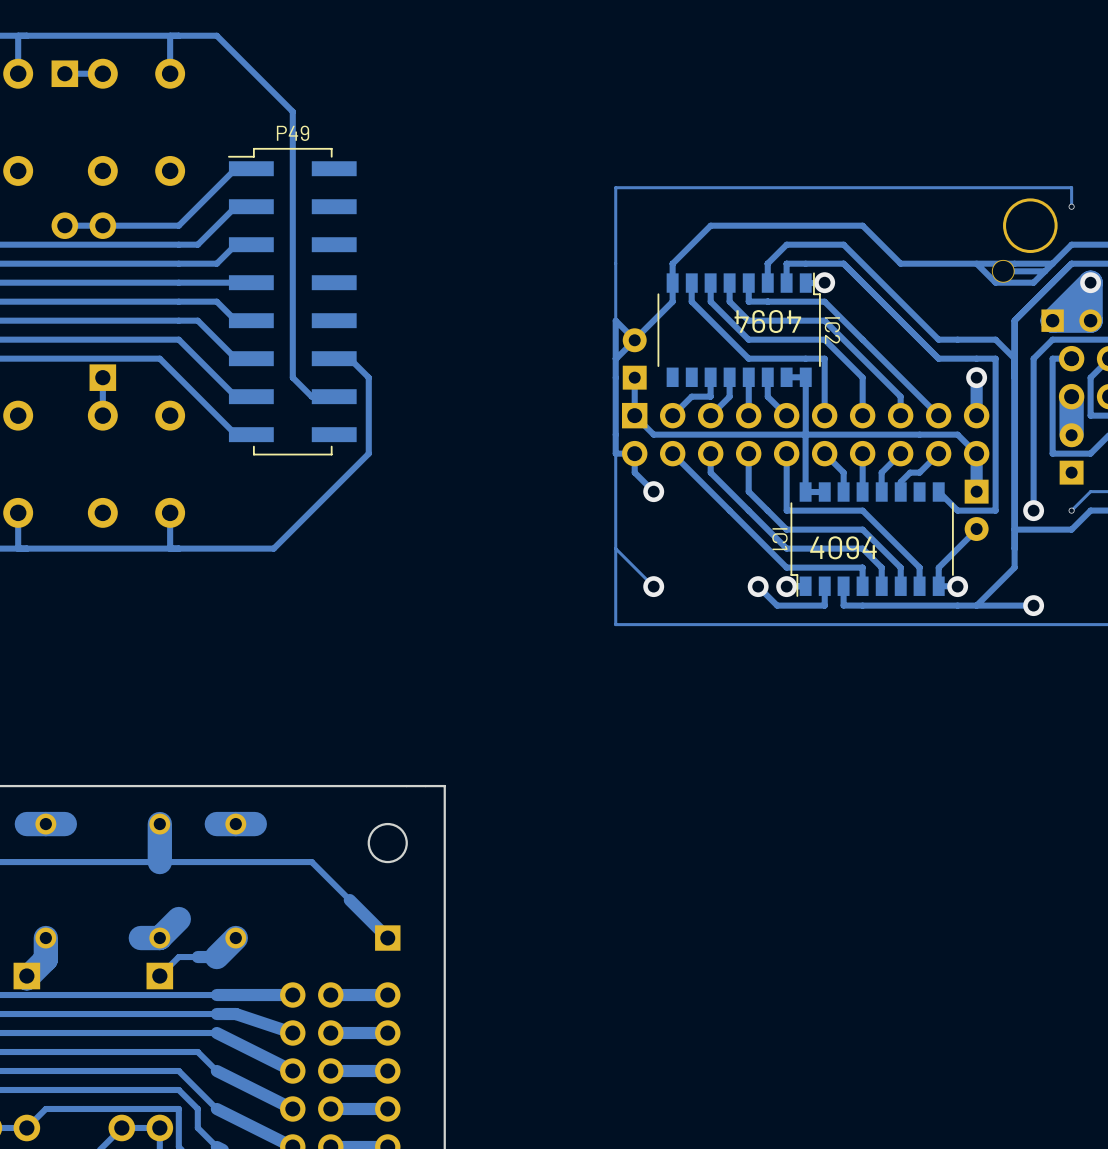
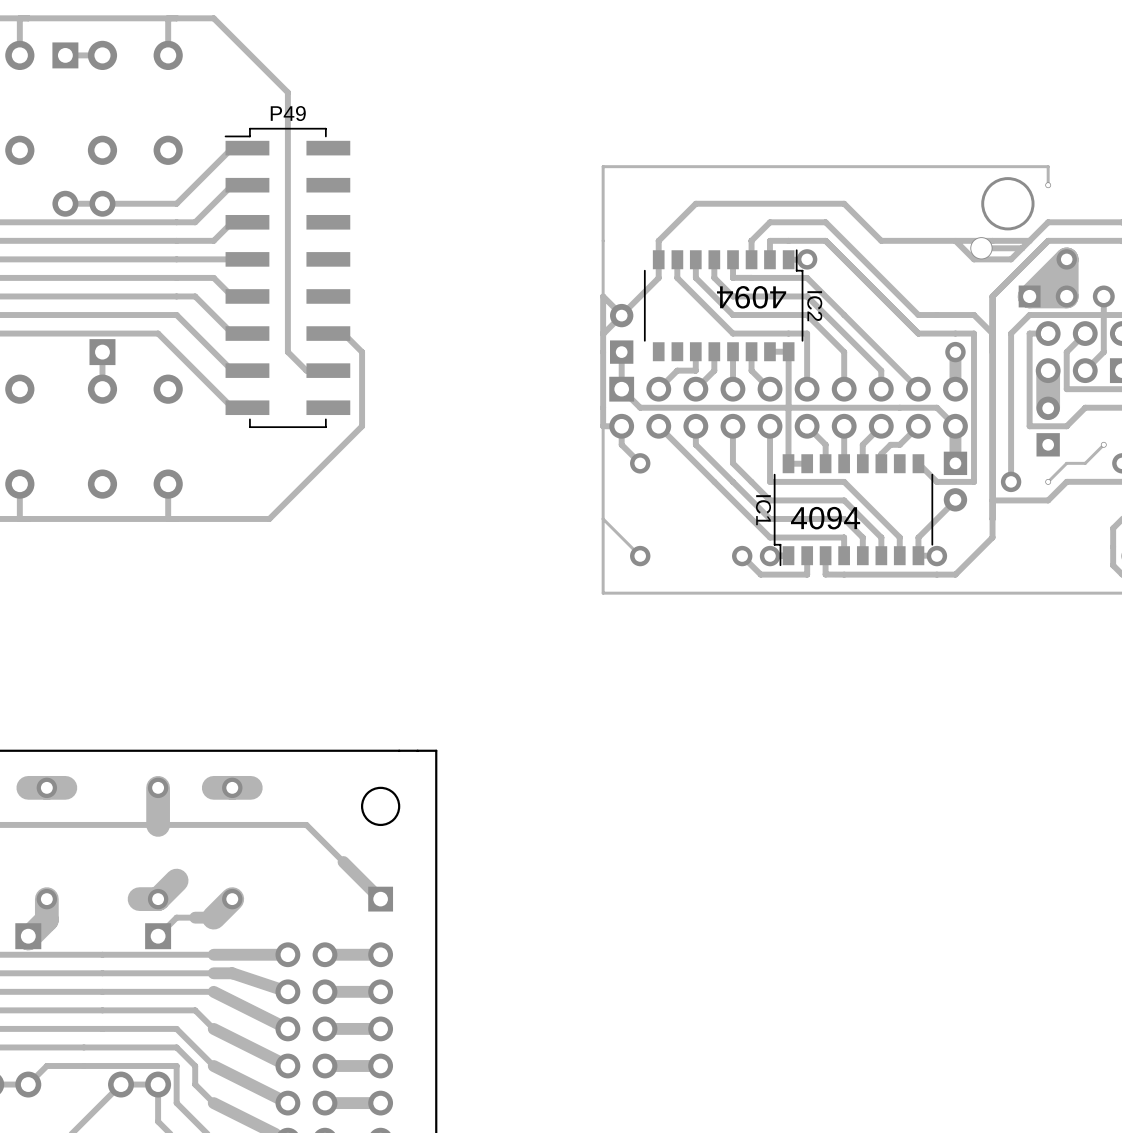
track: (1033, 605) (976, 605) -> none
via: (1033, 605) -> none

